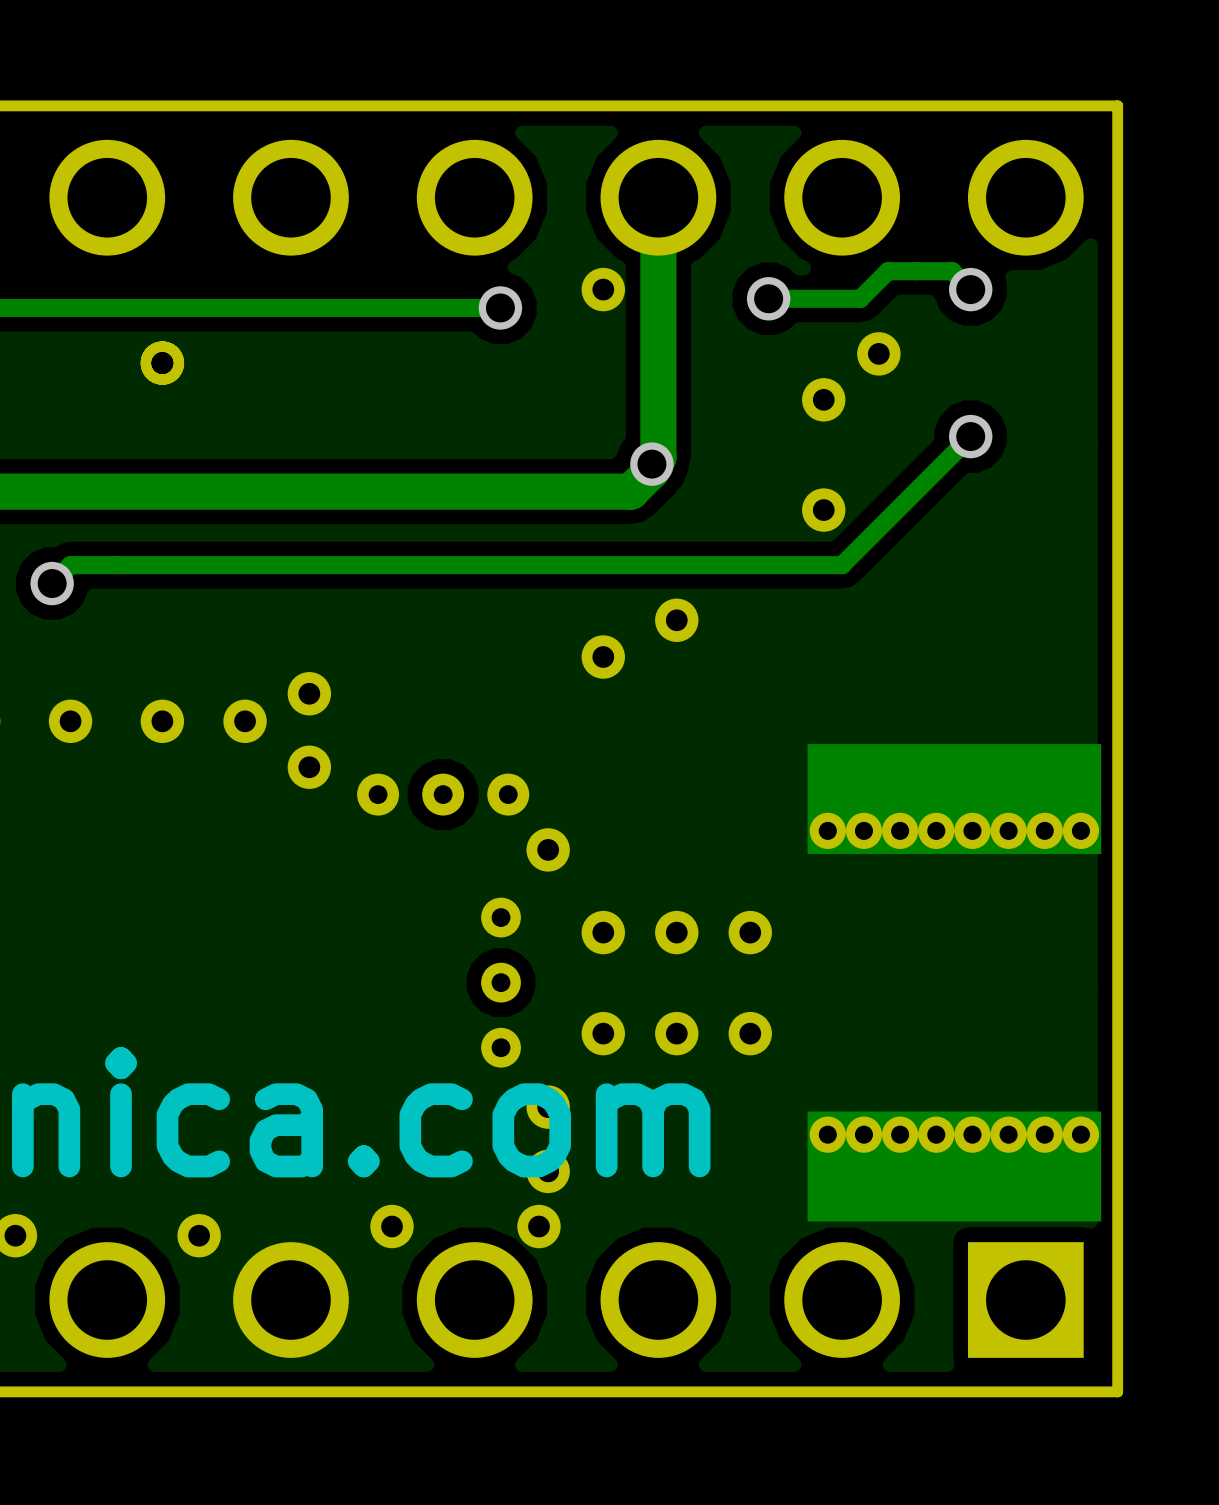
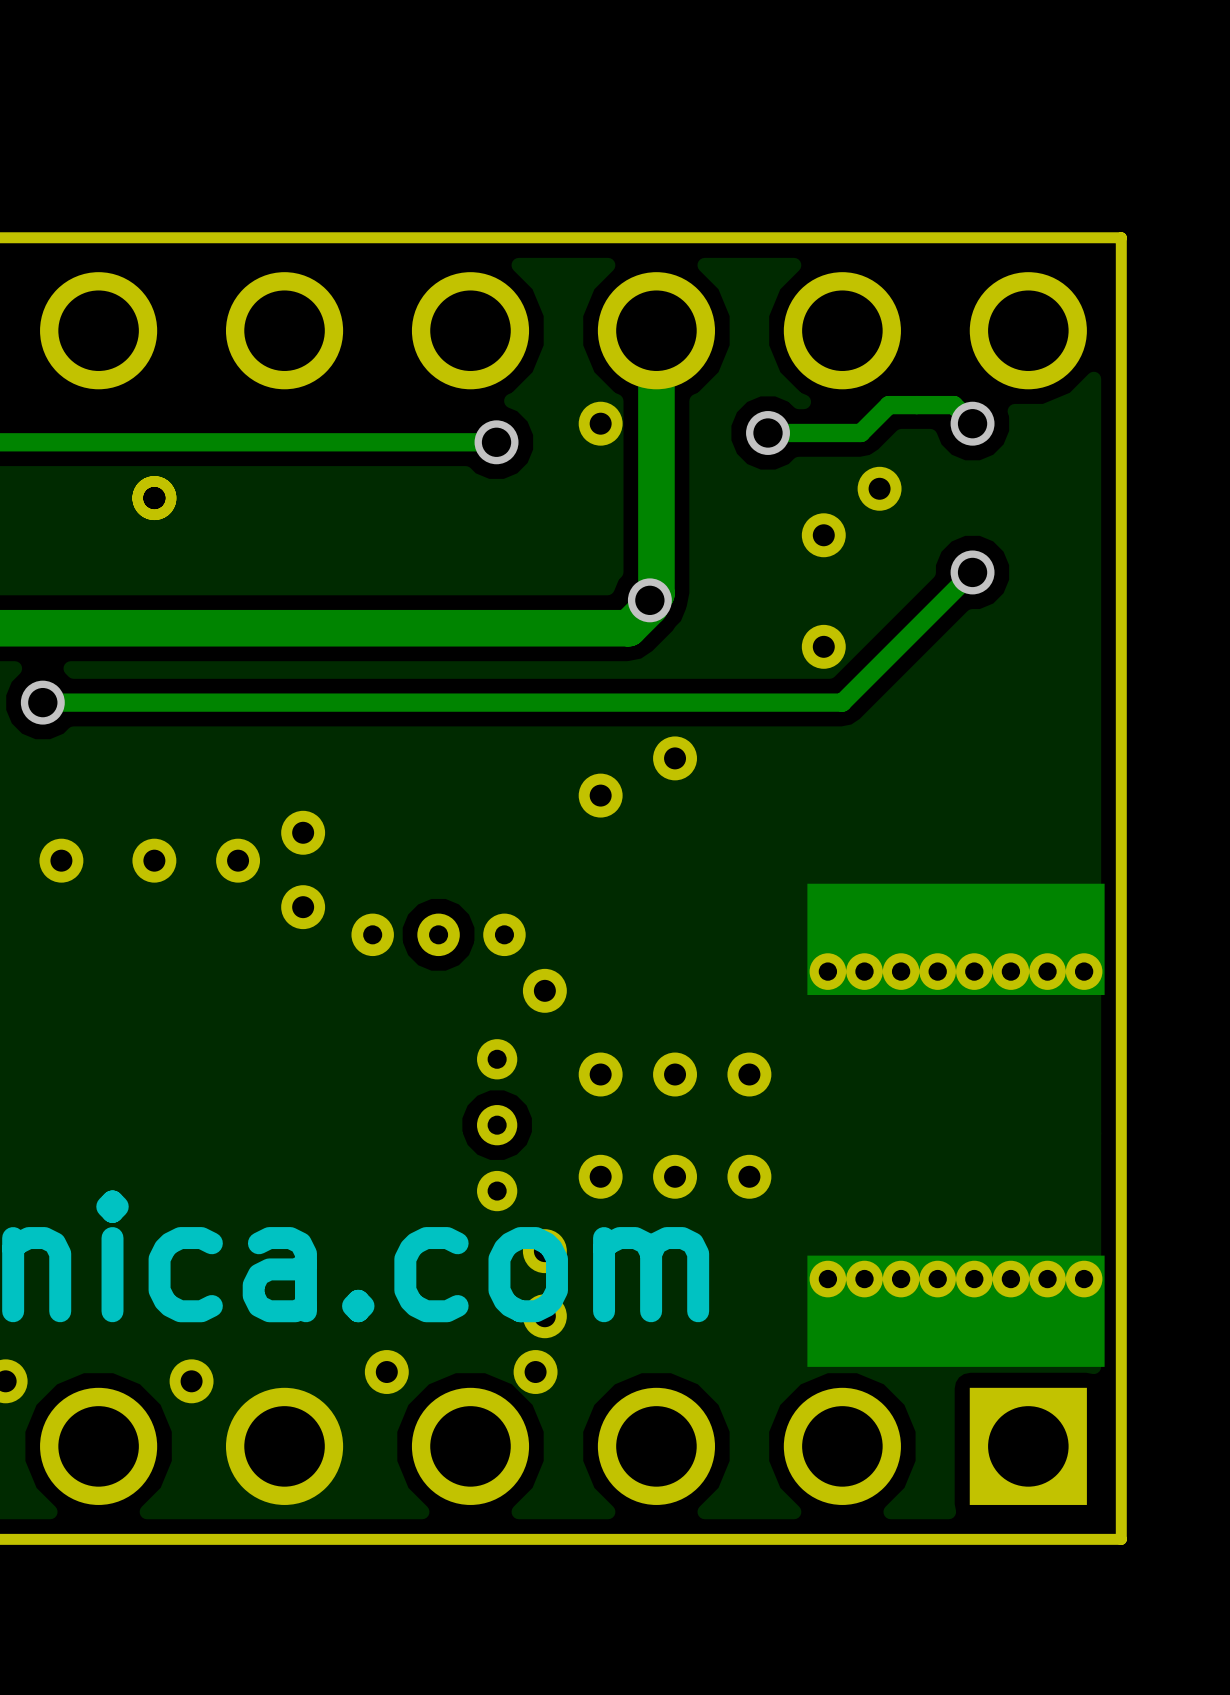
via position: (52, 583) -> (42, 702)

